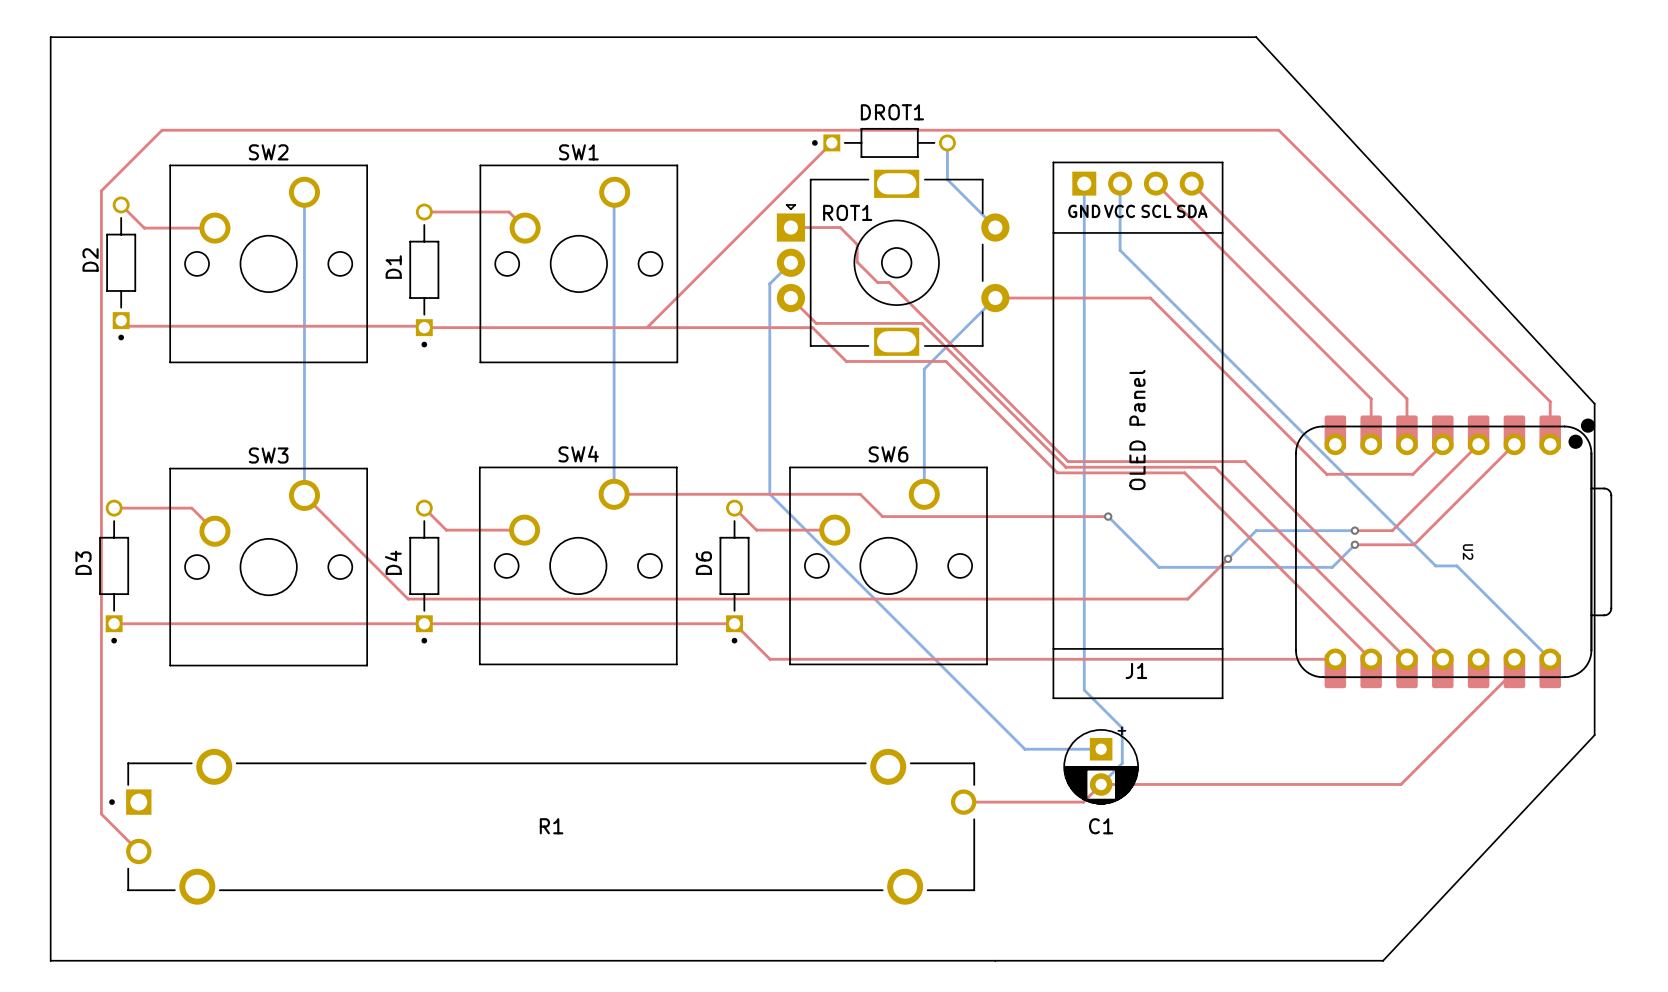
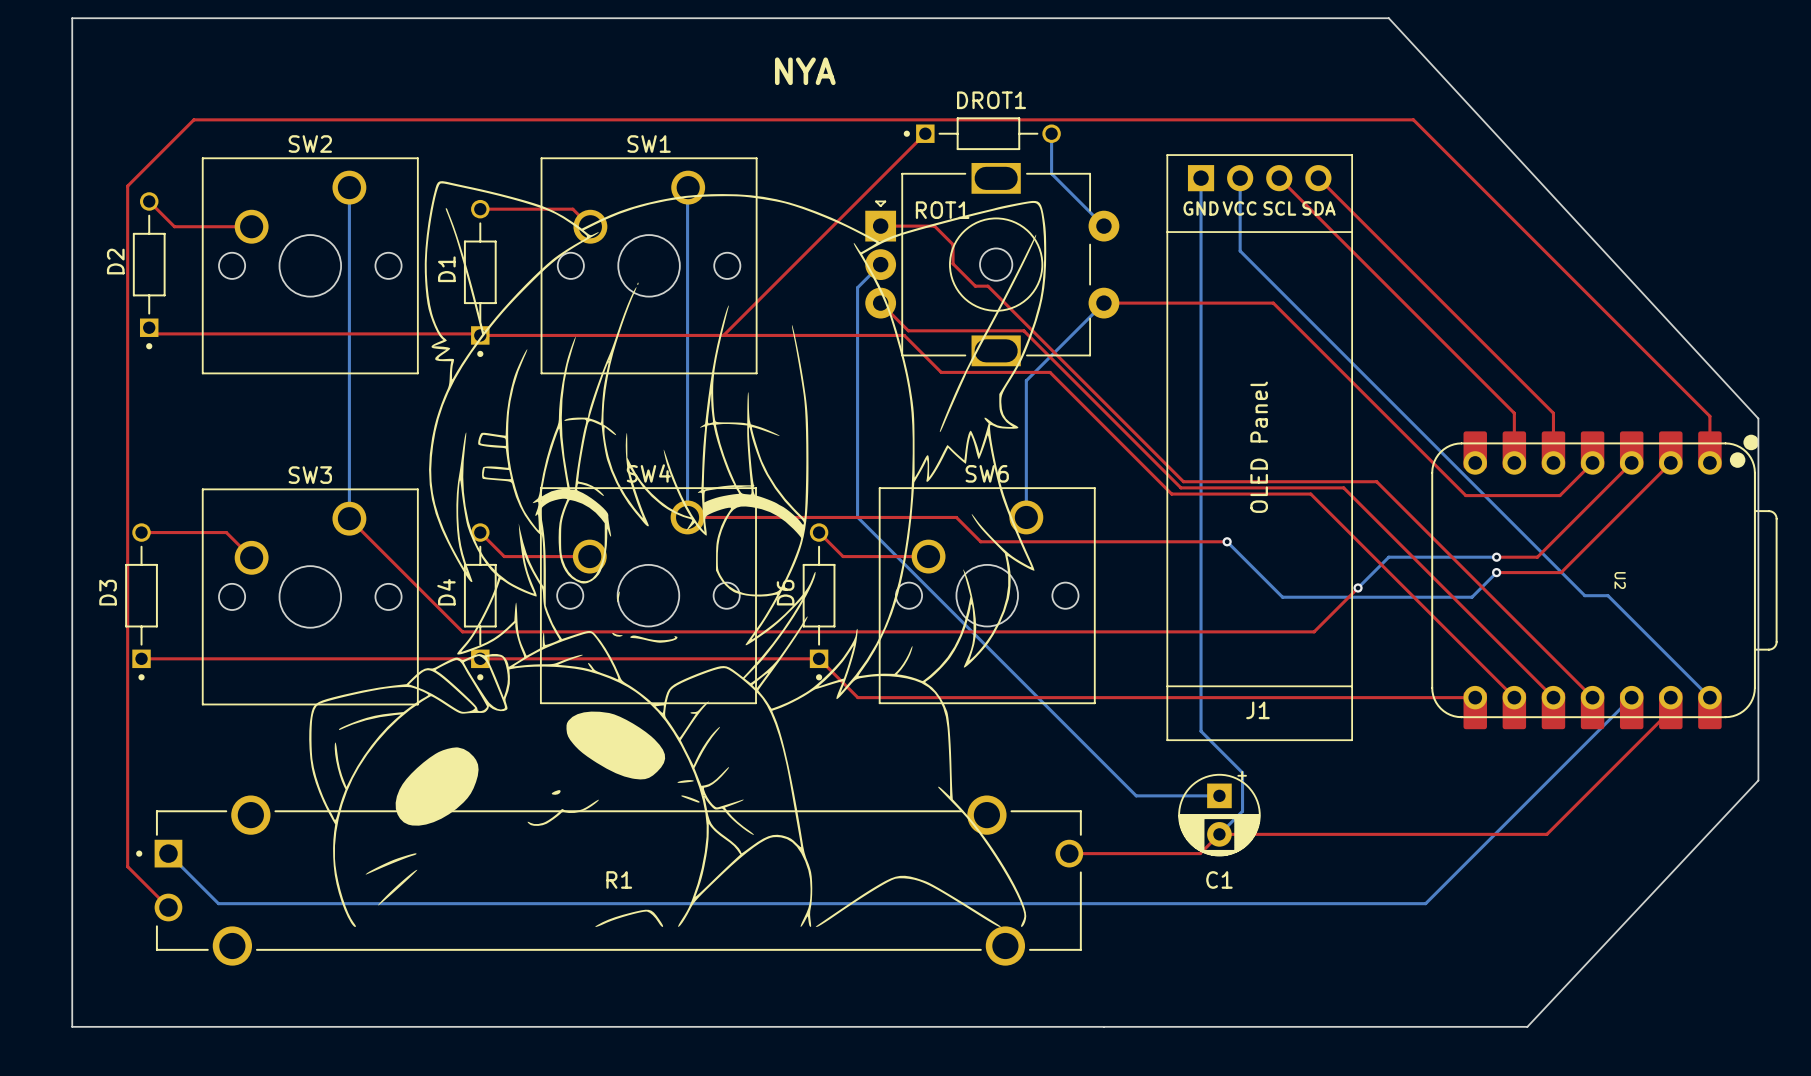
NYA: none -> (677, 554)
bottom track: none -> (1631, 697) (1425, 903) (218, 903) (168, 853)

